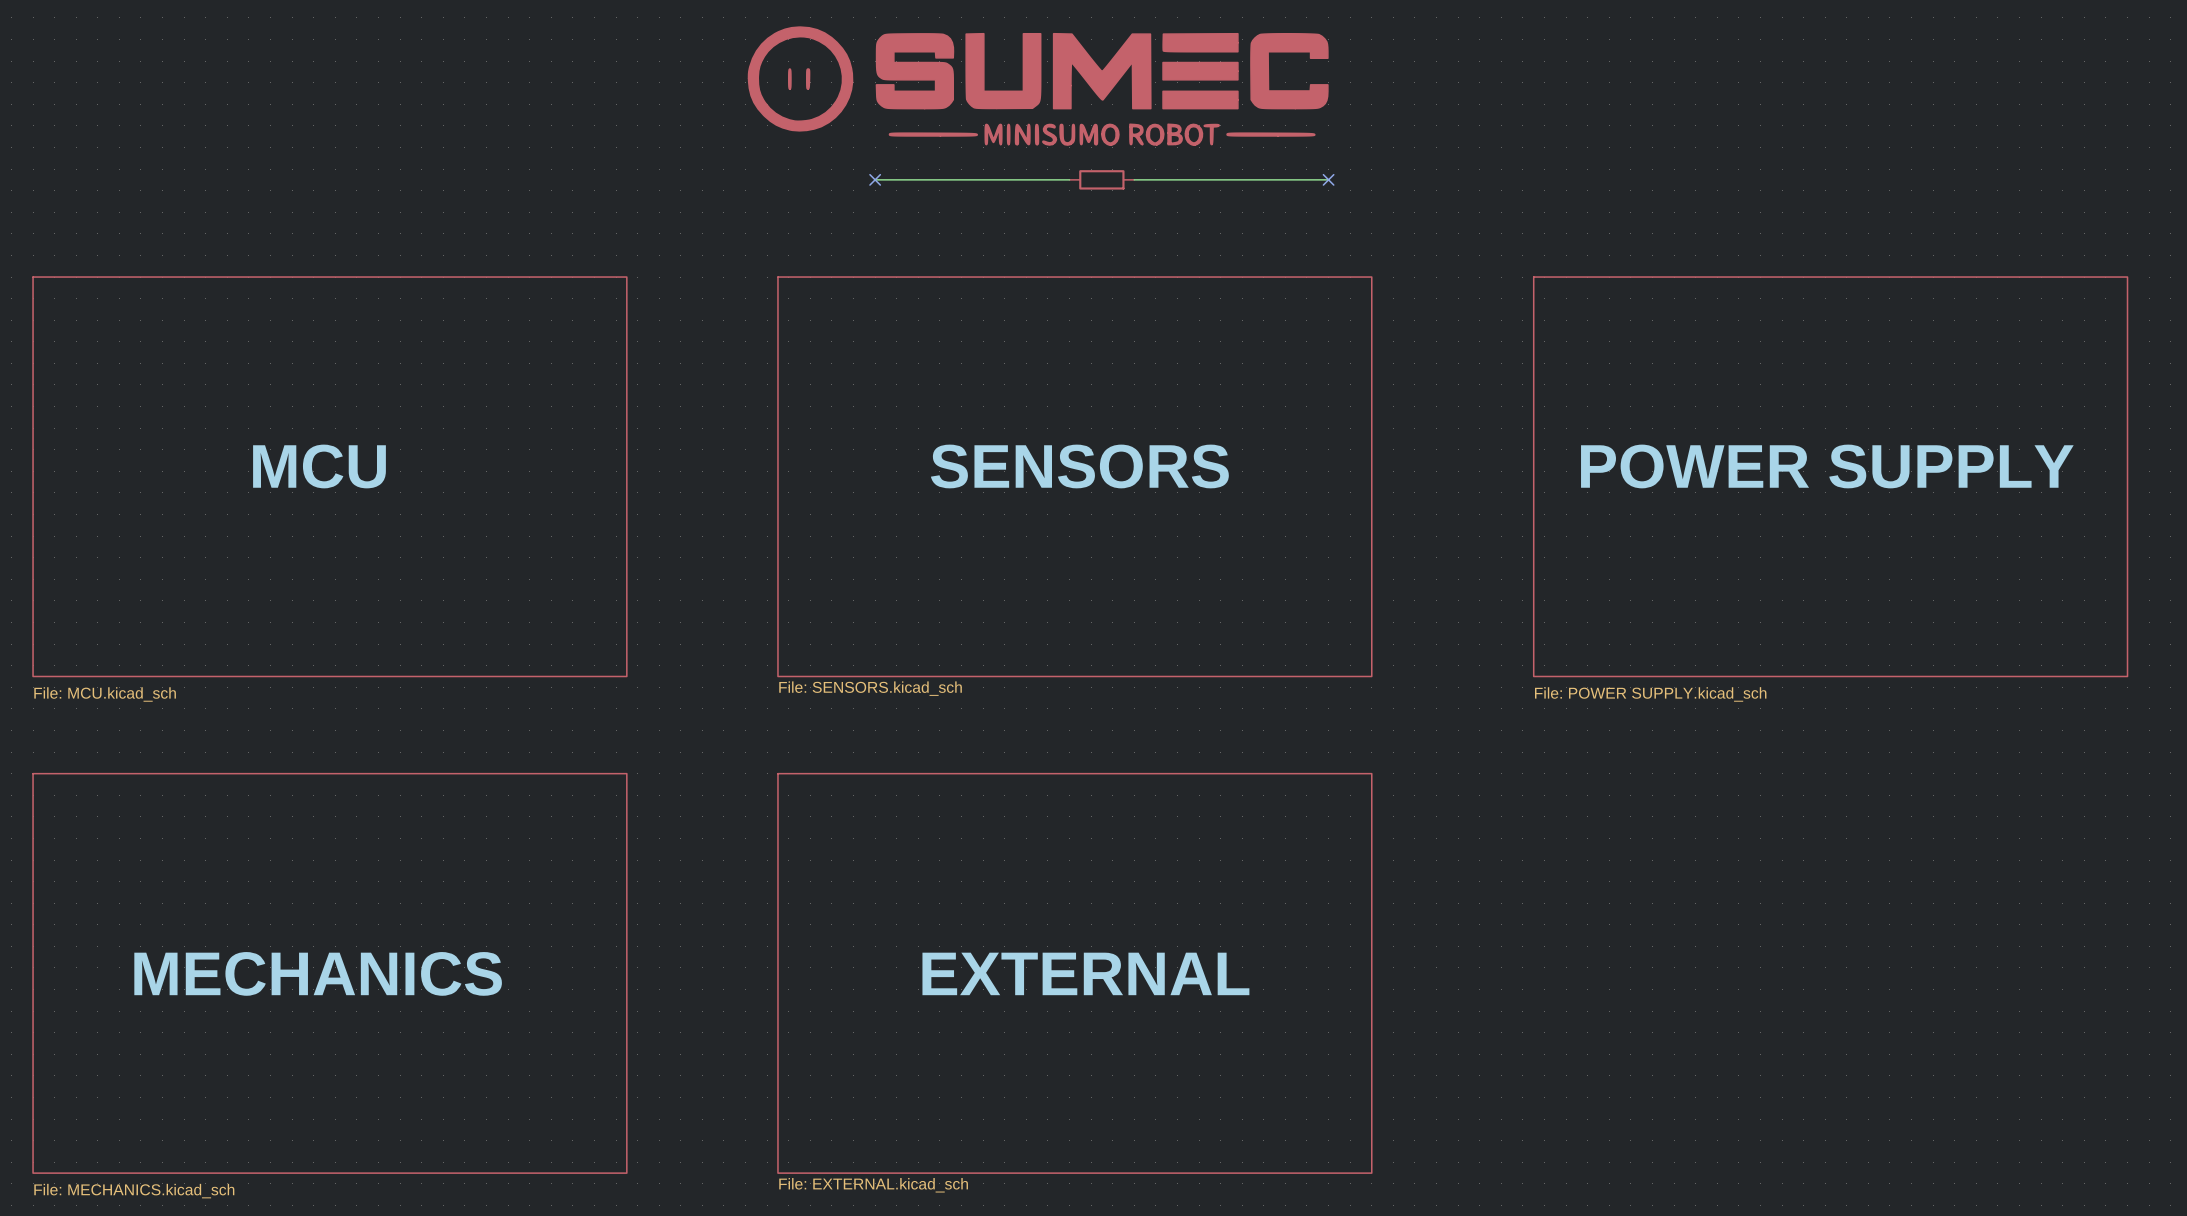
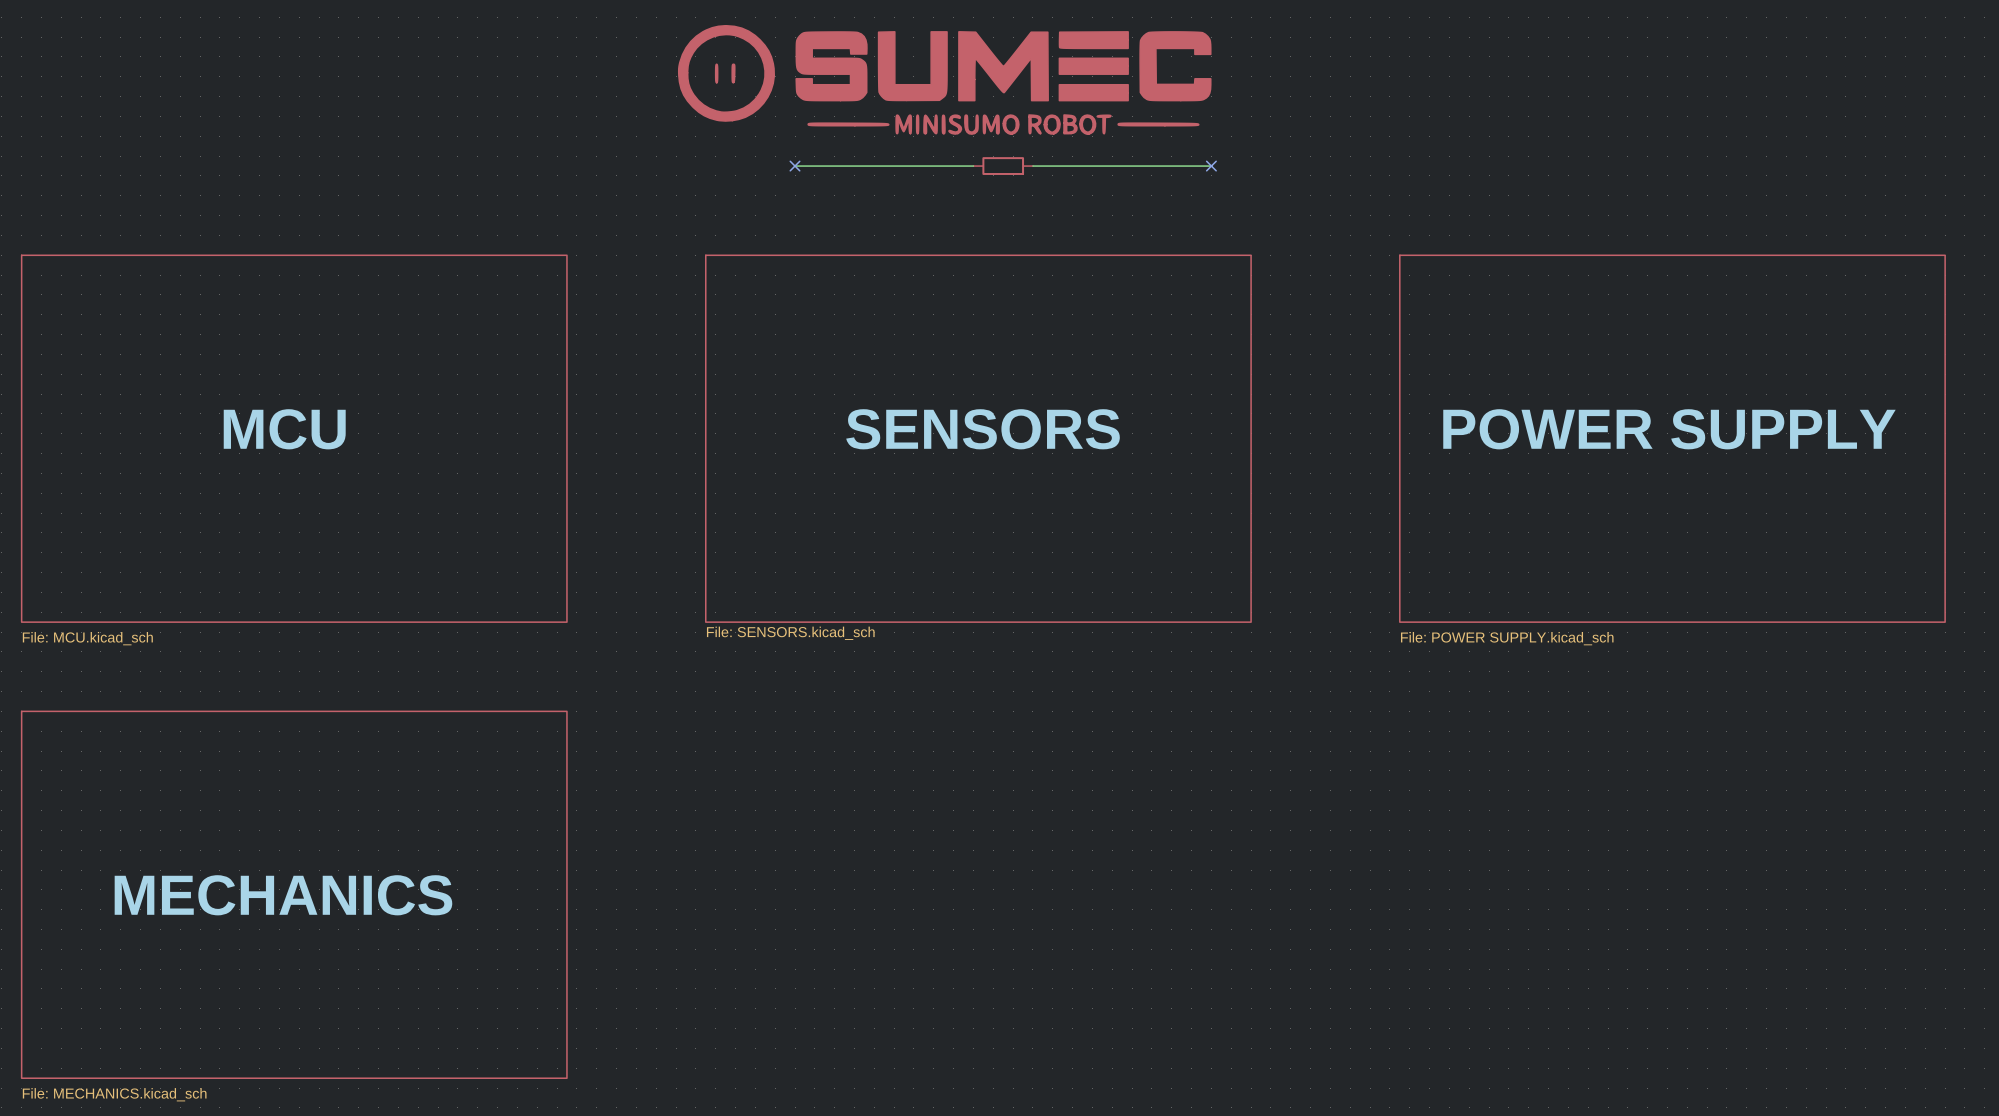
sheet EXTERNAL: File: EXTERNAL.kicad_sch (1074, 973) -> none

